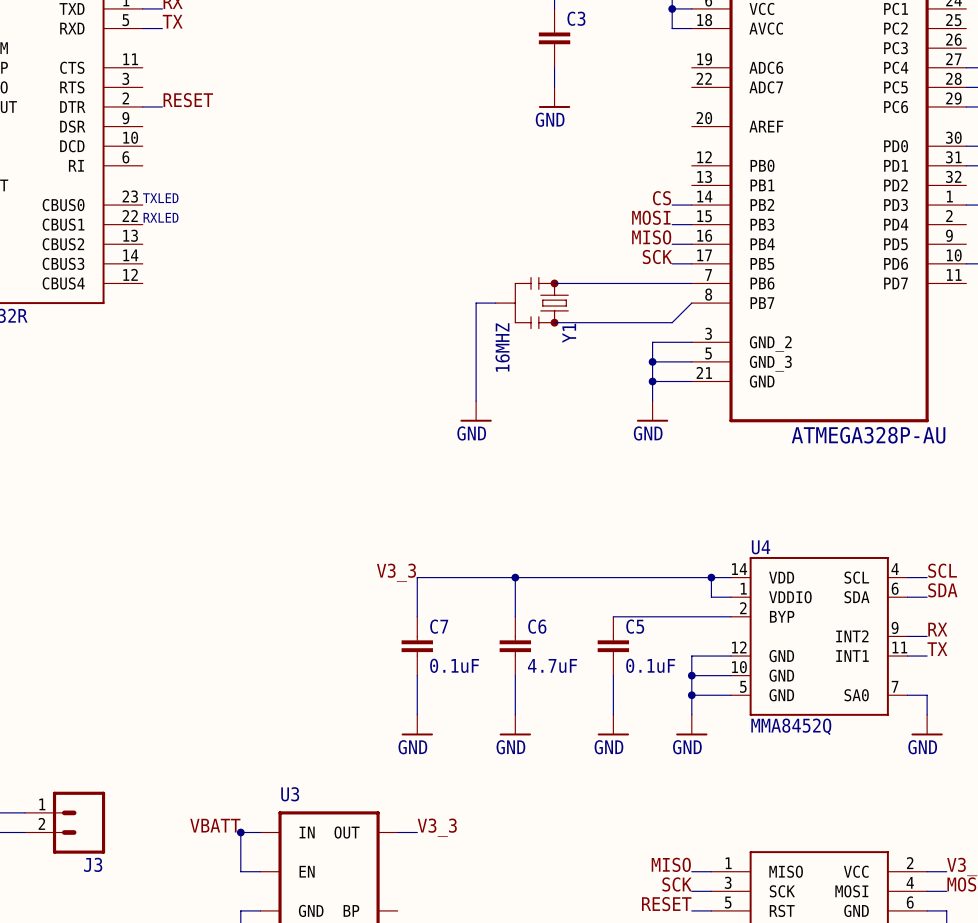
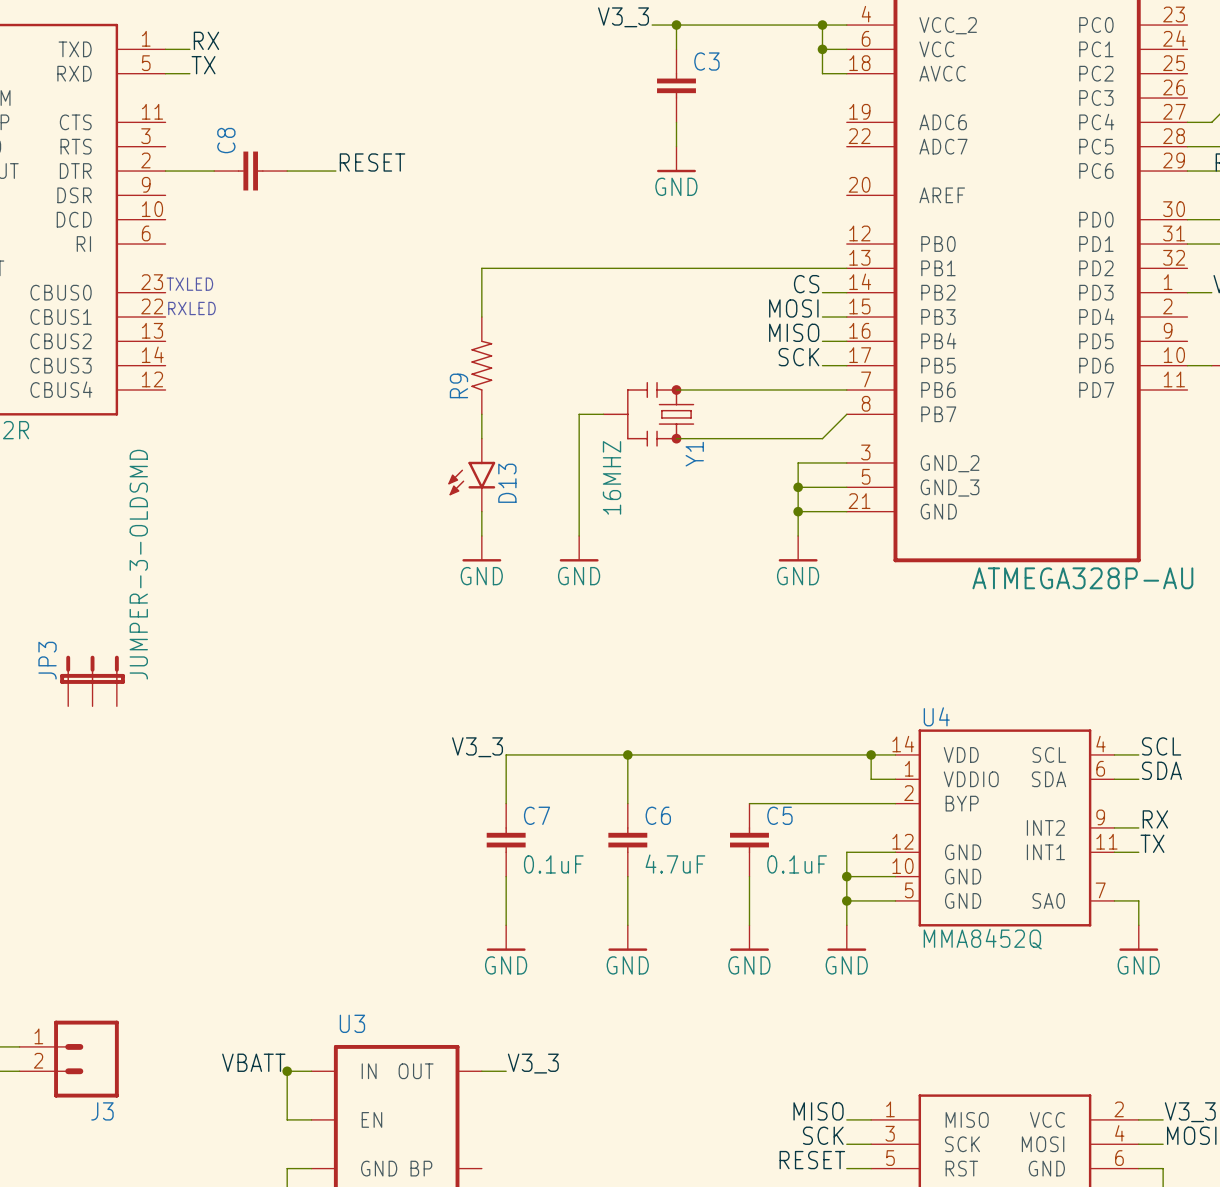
label position: RESET (188, 100) -> RESET (372, 162)
wire: none -> (189, 171) (214, 171)
C8: none -> (250, 171)
wire: none -> (287, 171) (335, 171)
wire: none -> (846, 268) (481, 268) (481, 317)
R9: none -> (481, 365)
wire: none -> (481, 414) (481, 438)
D13: none -> (471, 475)
wire: none -> (481, 511) (481, 535)
power symbol: none -> GND (481, 548)
JP3: none -> JUMPER-3-OLDSMD (92, 680)

